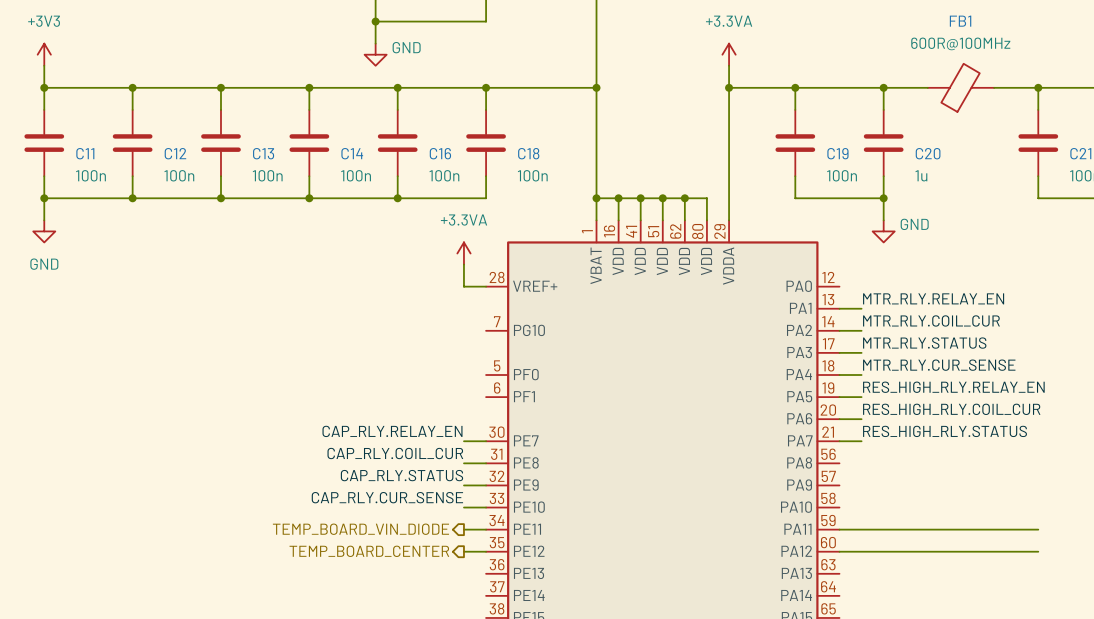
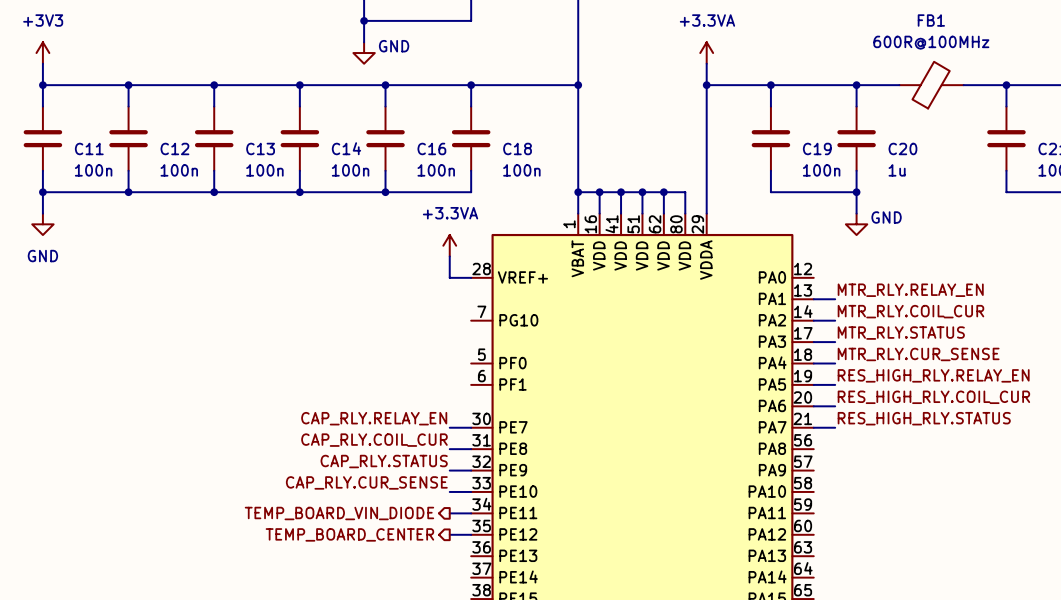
wire: (839, 529) (1038, 529) -> none
wire: (839, 551) (1038, 551) -> none

